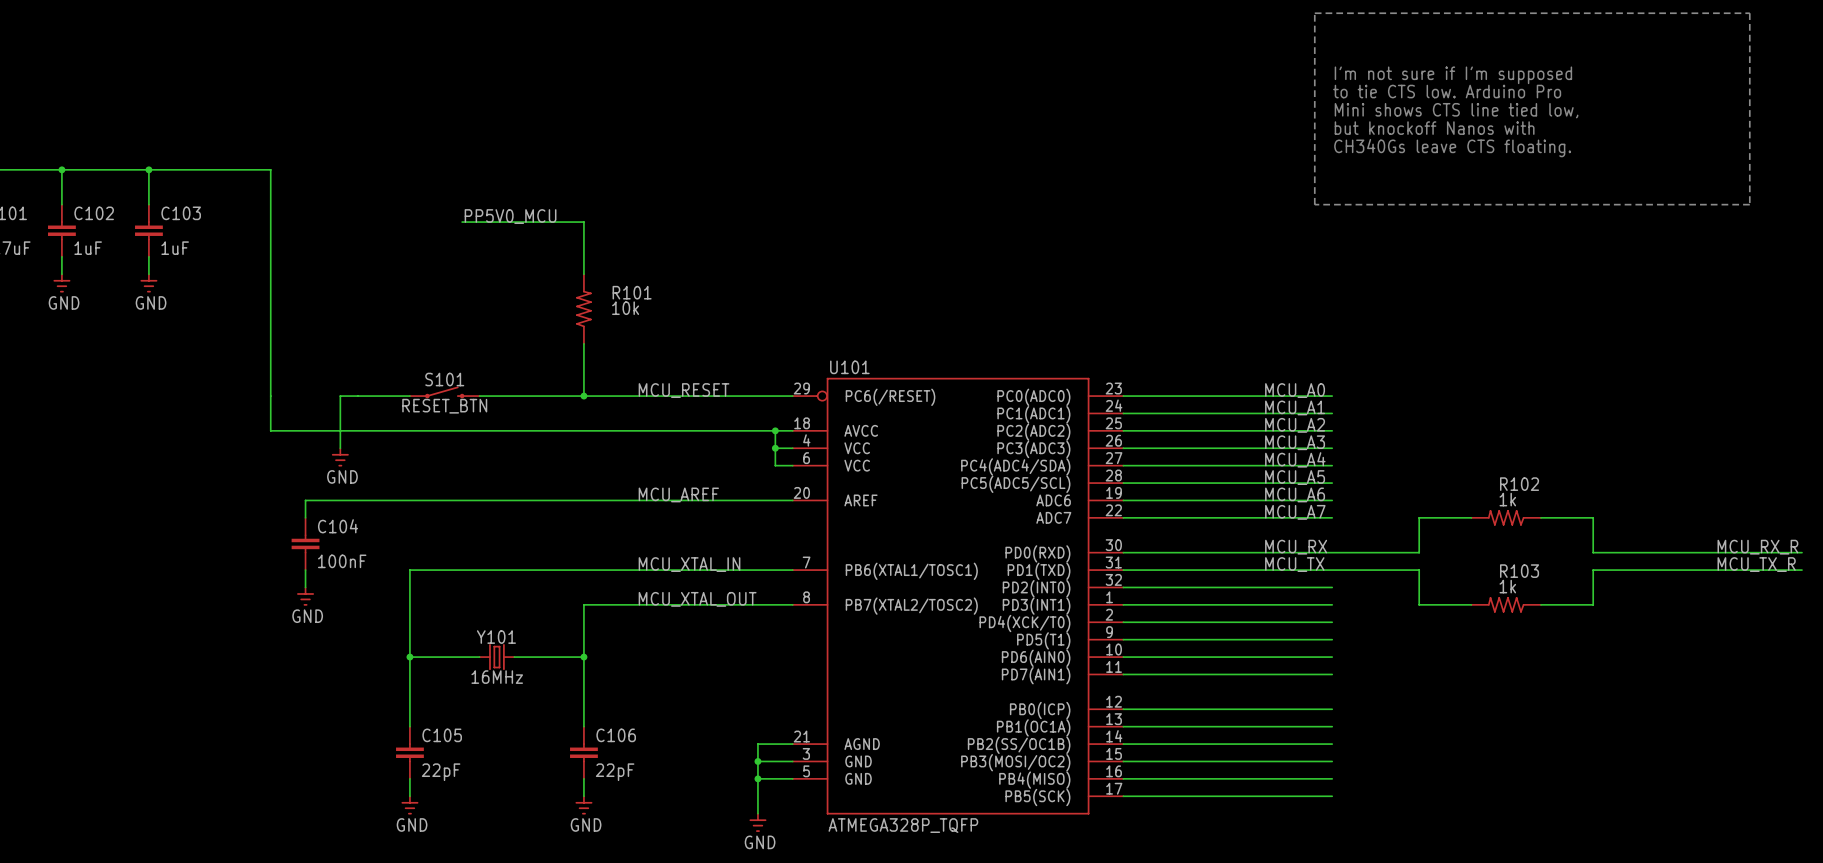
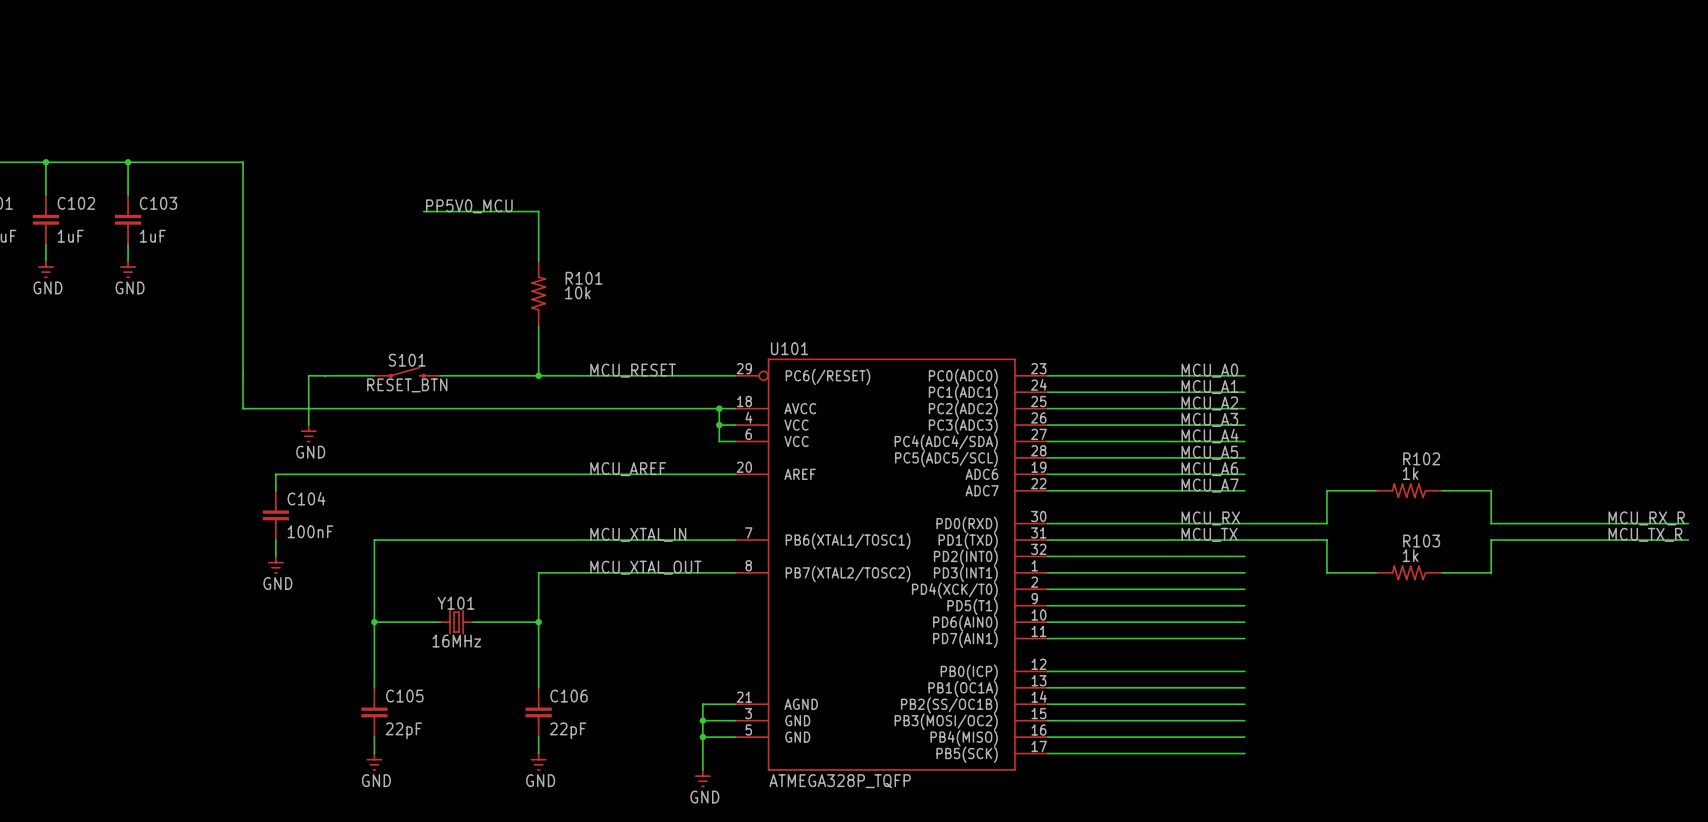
line: (1314, 13) (1314, 204) (1749, 204) (1749, 13) (1314, 13) -> none
text: I'm not sure if I'm supposed (1453, 75) -> none
text: to tie CTS low. Arduino Pro (1447, 91) -> none
text: Mini shows CTS line tied low, (1456, 110) -> none
text: but knockoff Nanos with (1434, 128) -> none
text: CH340Gs leave CTS floating. (1452, 148) -> none

